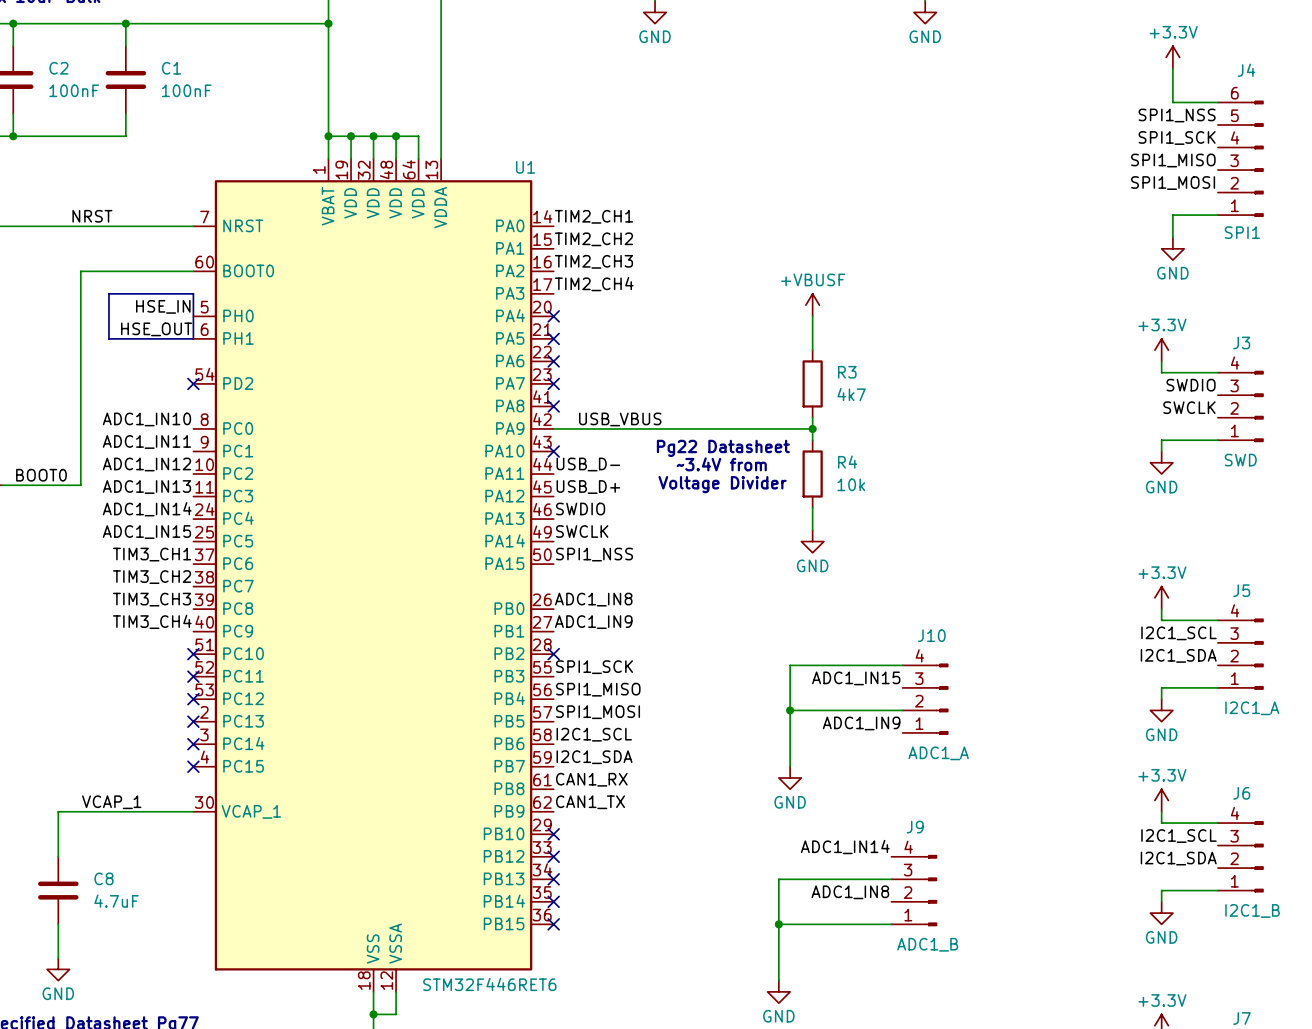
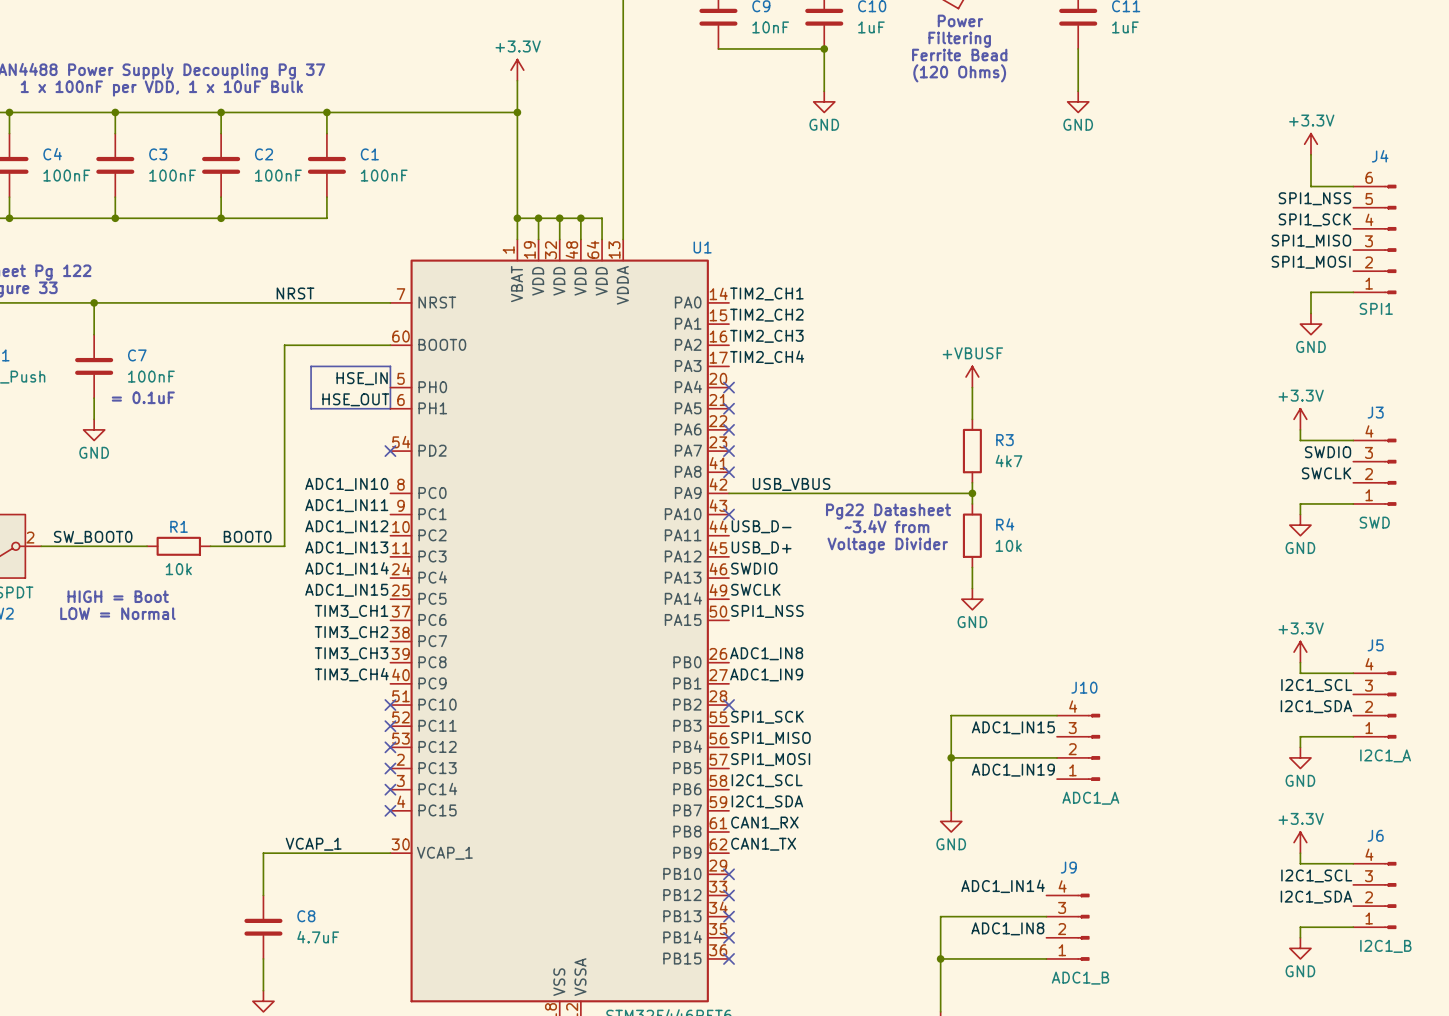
label: ADC1_IN9 (861, 723) -> ADC1_IN19 (1013, 770)

